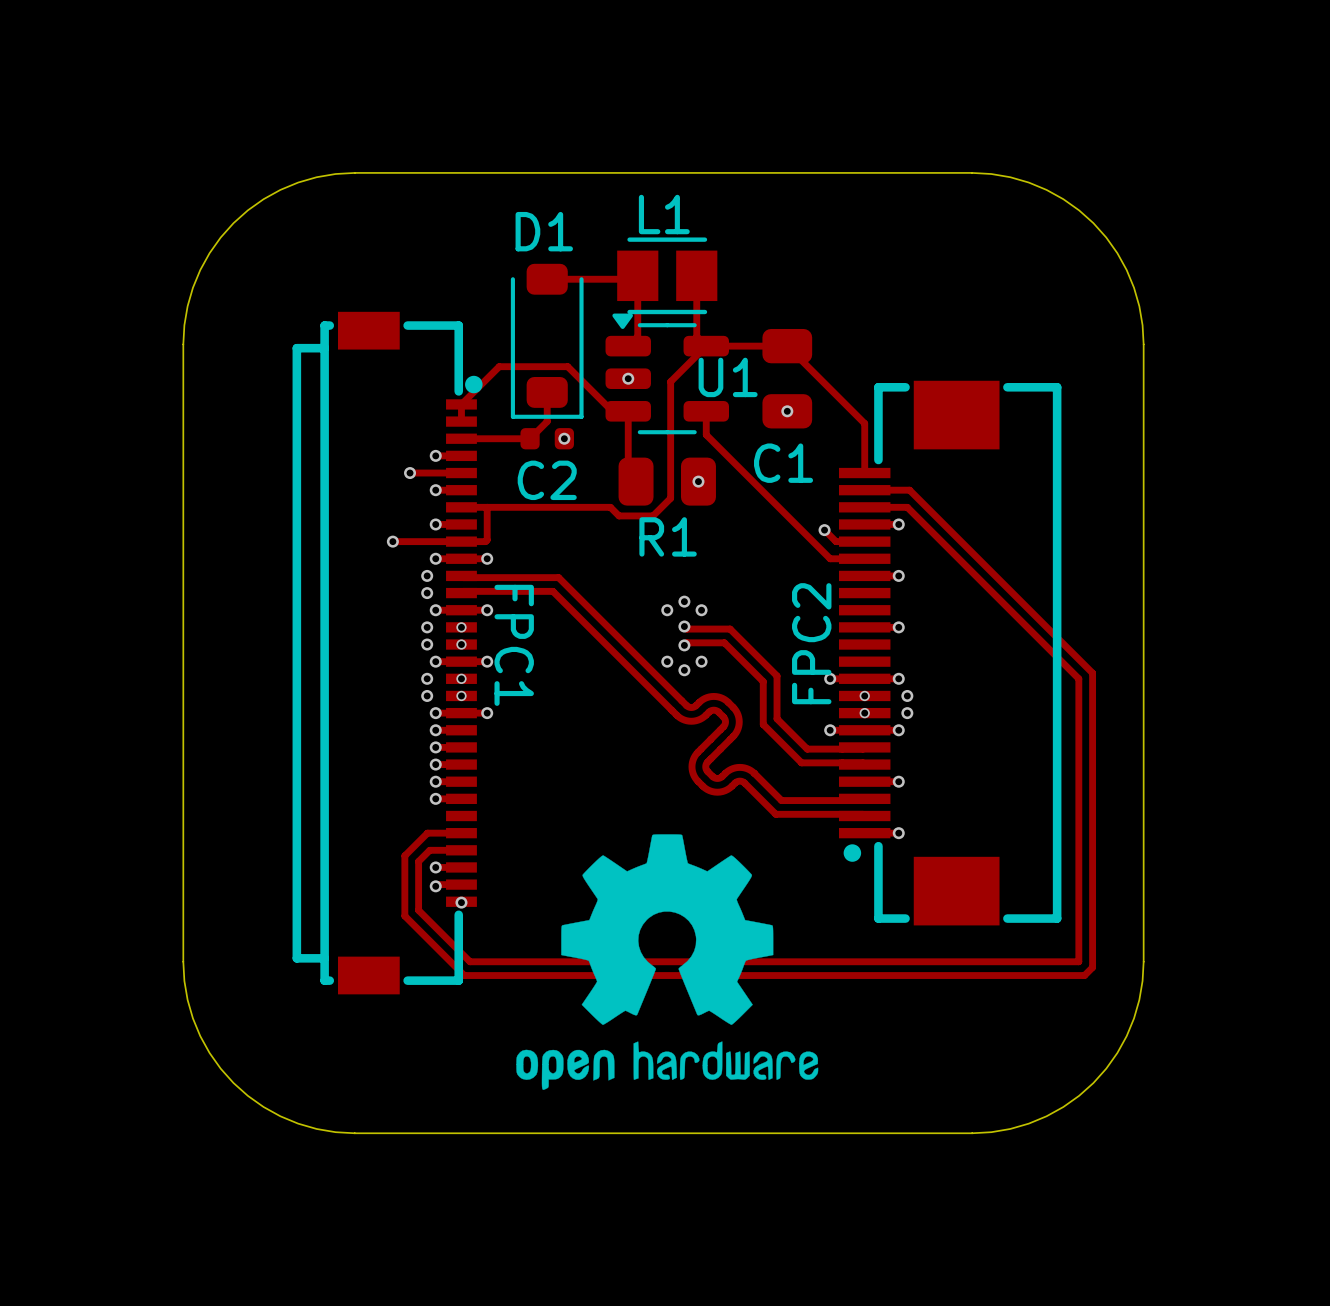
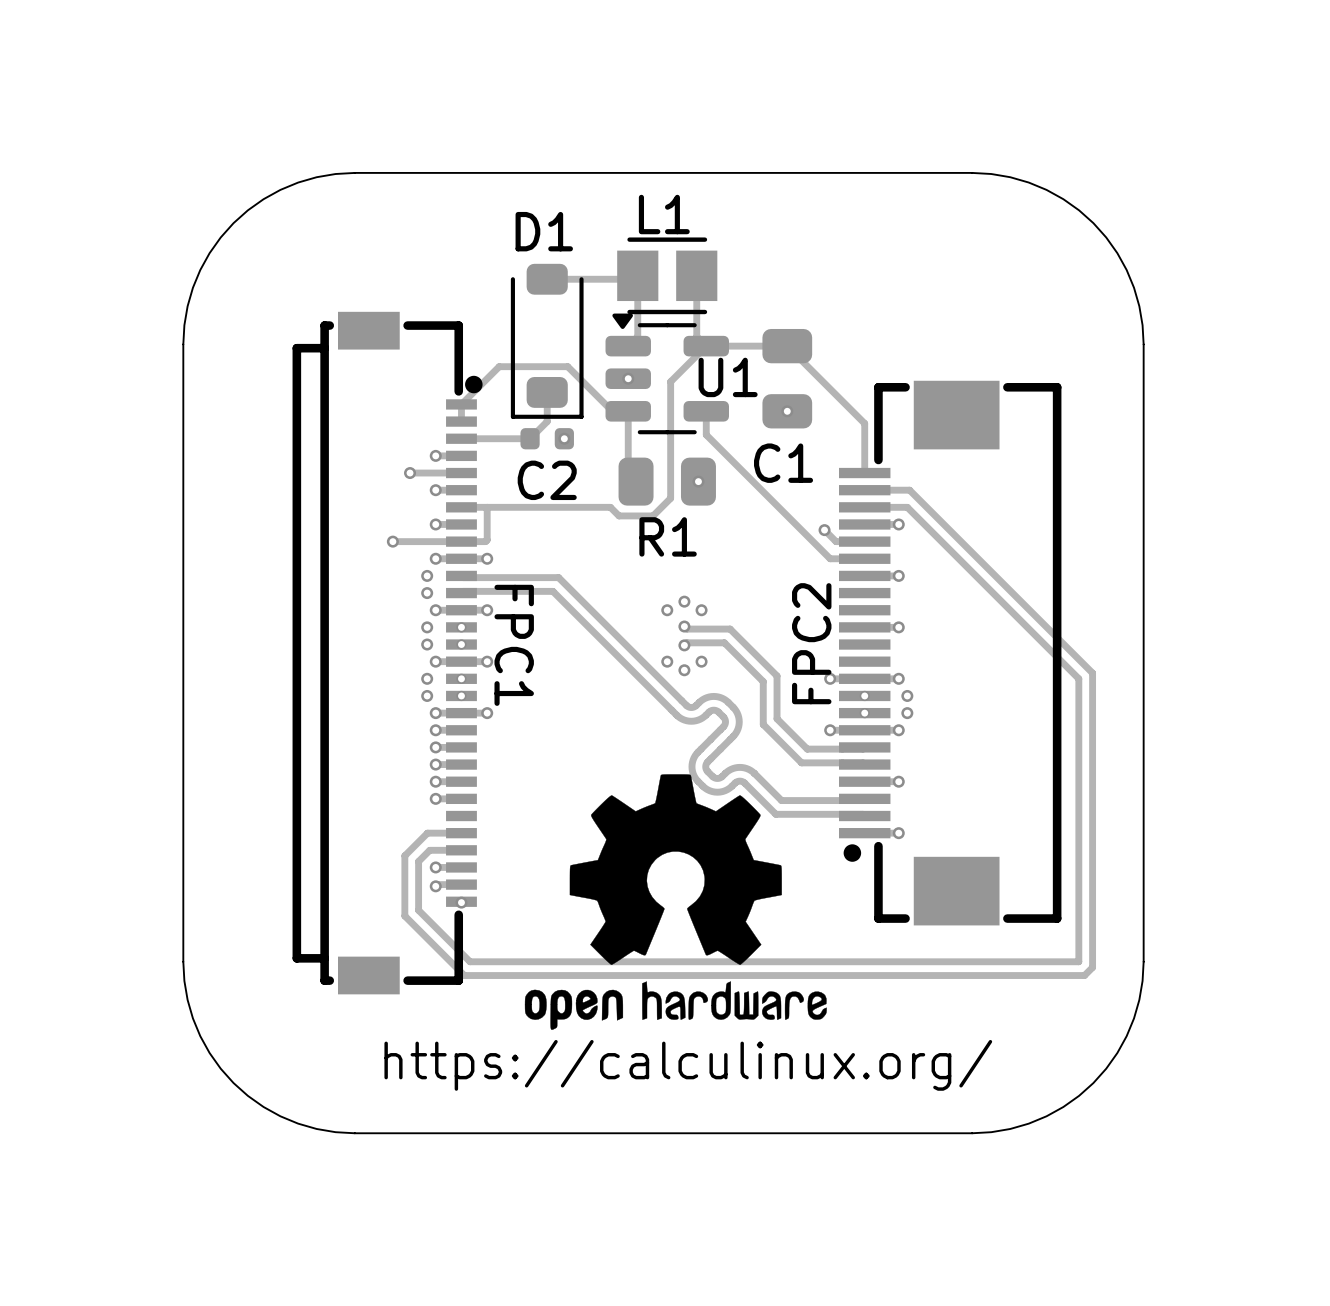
drawing position: (667, 962) -> (675, 902)
text: none -> https://calculinux.org/ (688, 1065)

